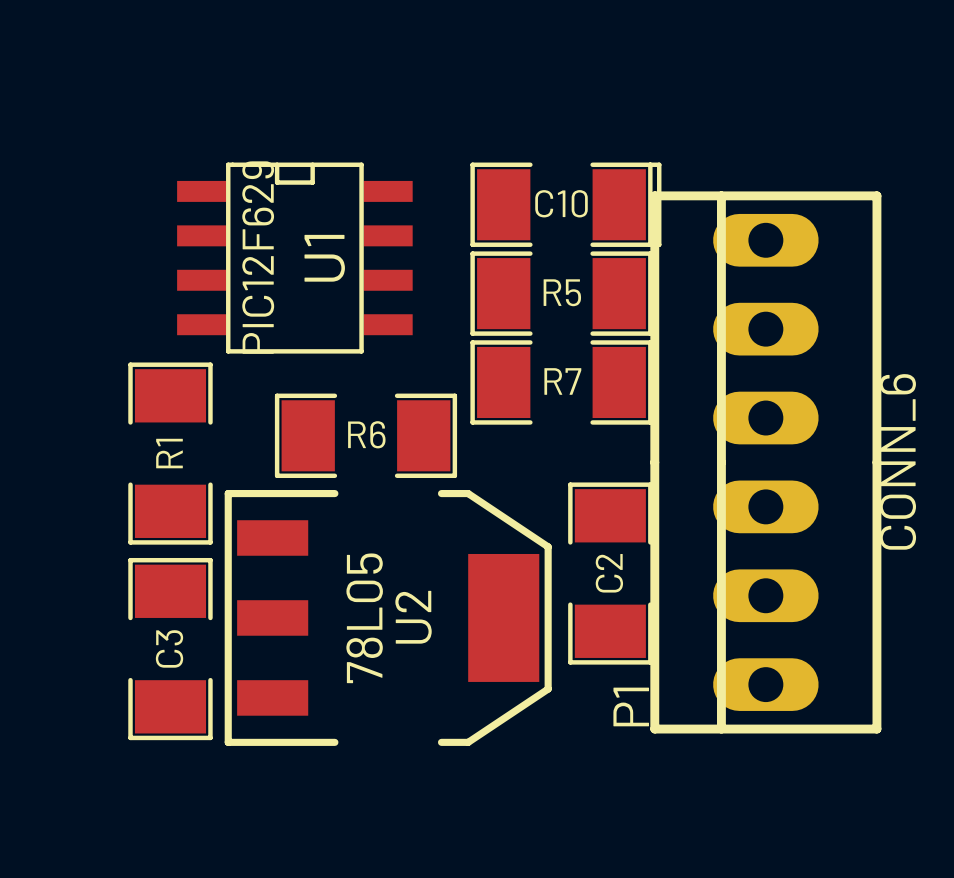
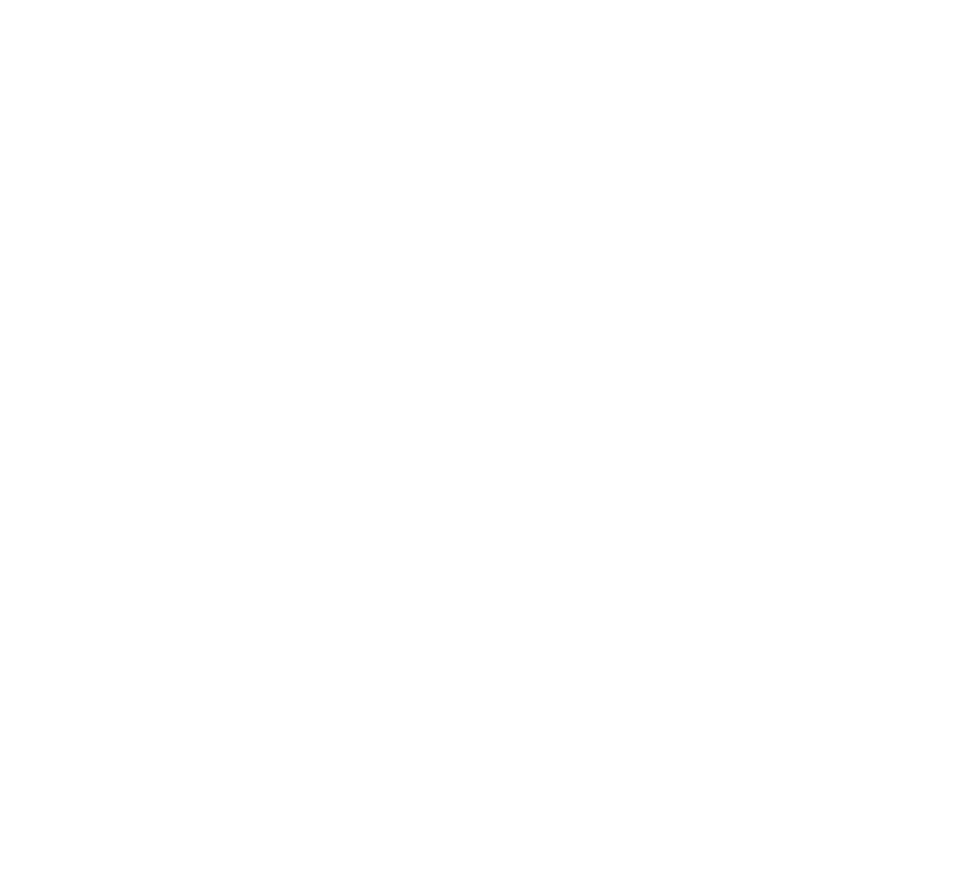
C10: (565, 204) -> none
U1: PIC12F629 (294, 258) -> none
R5: (561, 293) -> none
R7: (561, 382) -> none
R6: (365, 435) -> none
R1: (170, 453) -> none
P1: CONN_6 (765, 462) -> none
C2: (610, 573) -> none
U2: 78L05 (388, 617) -> none
C3: (170, 649) -> none

